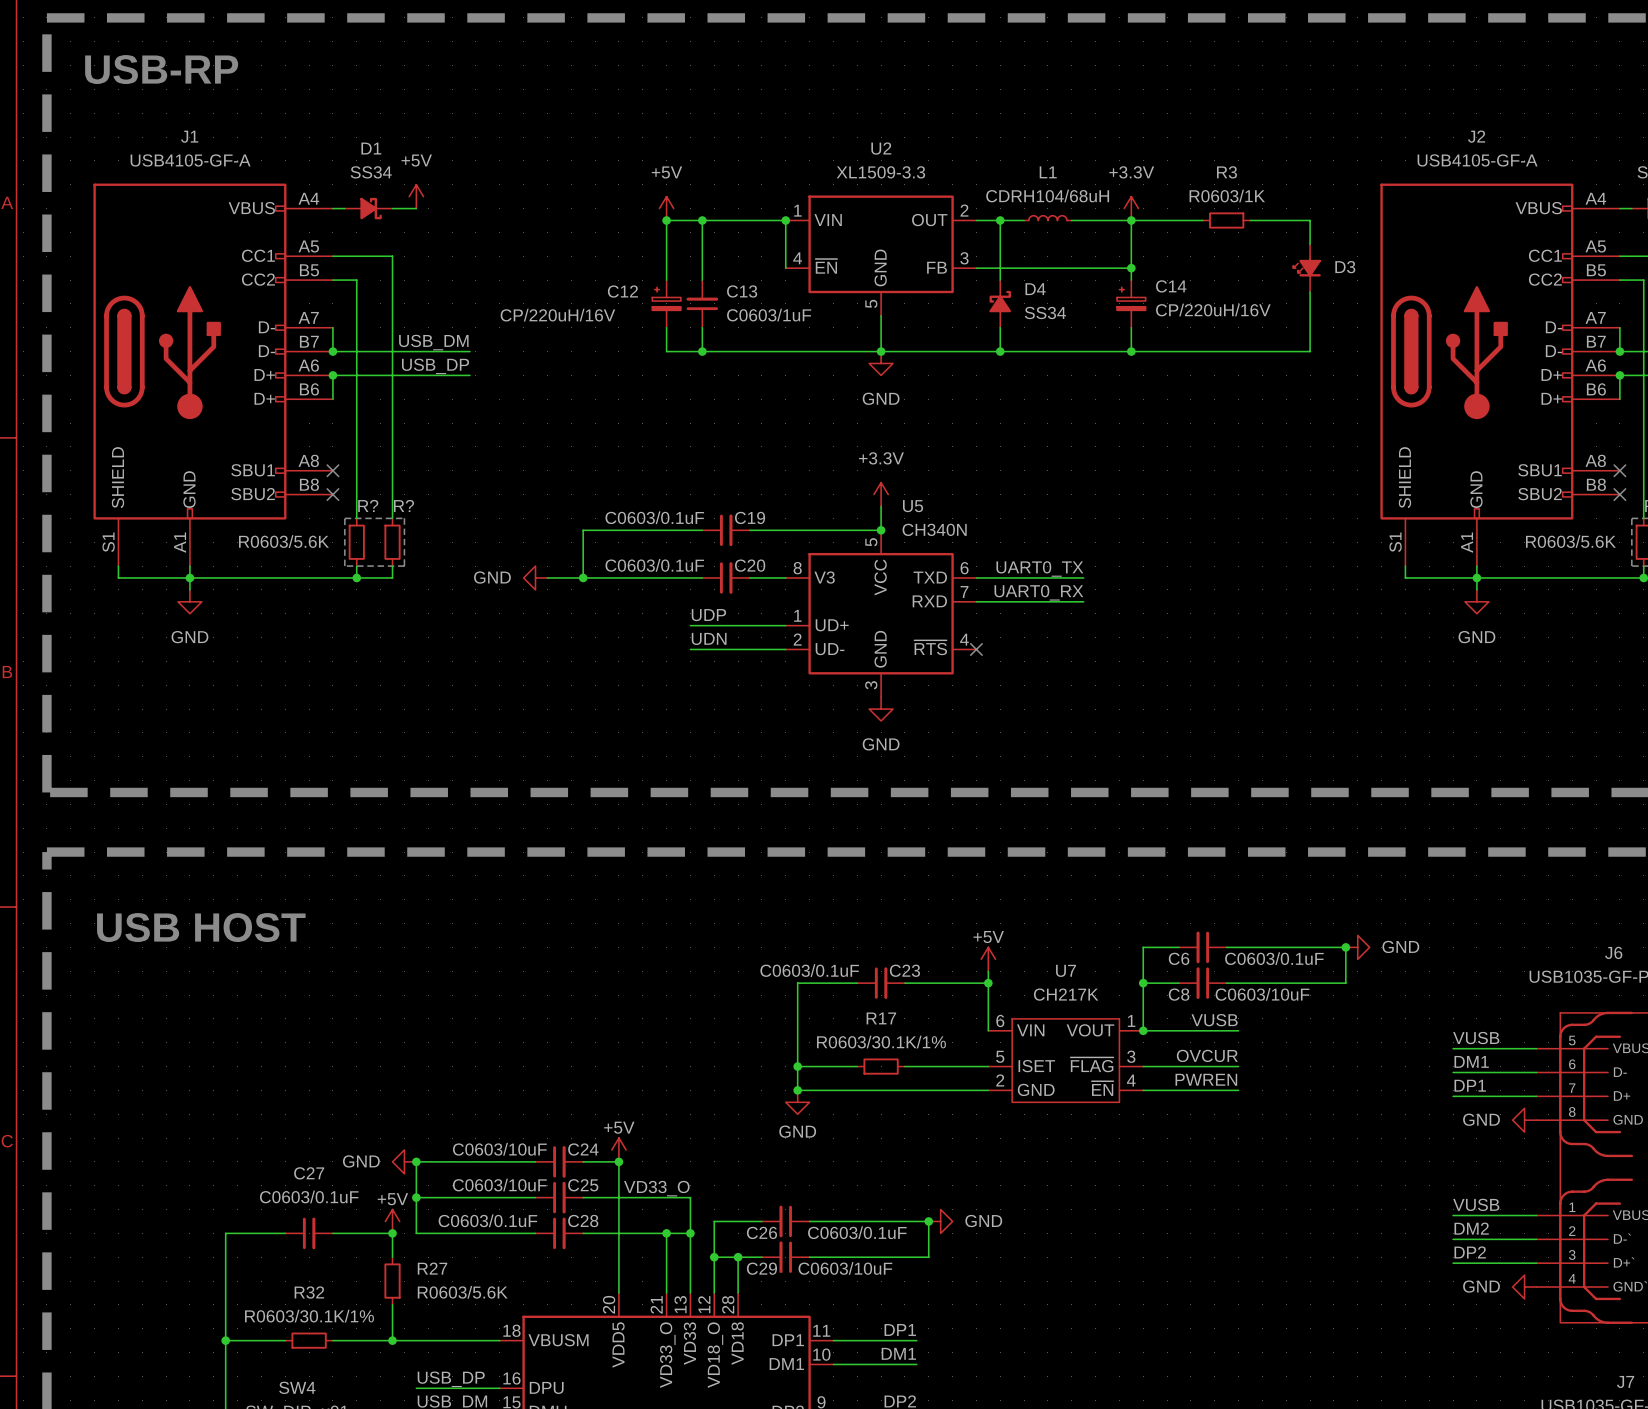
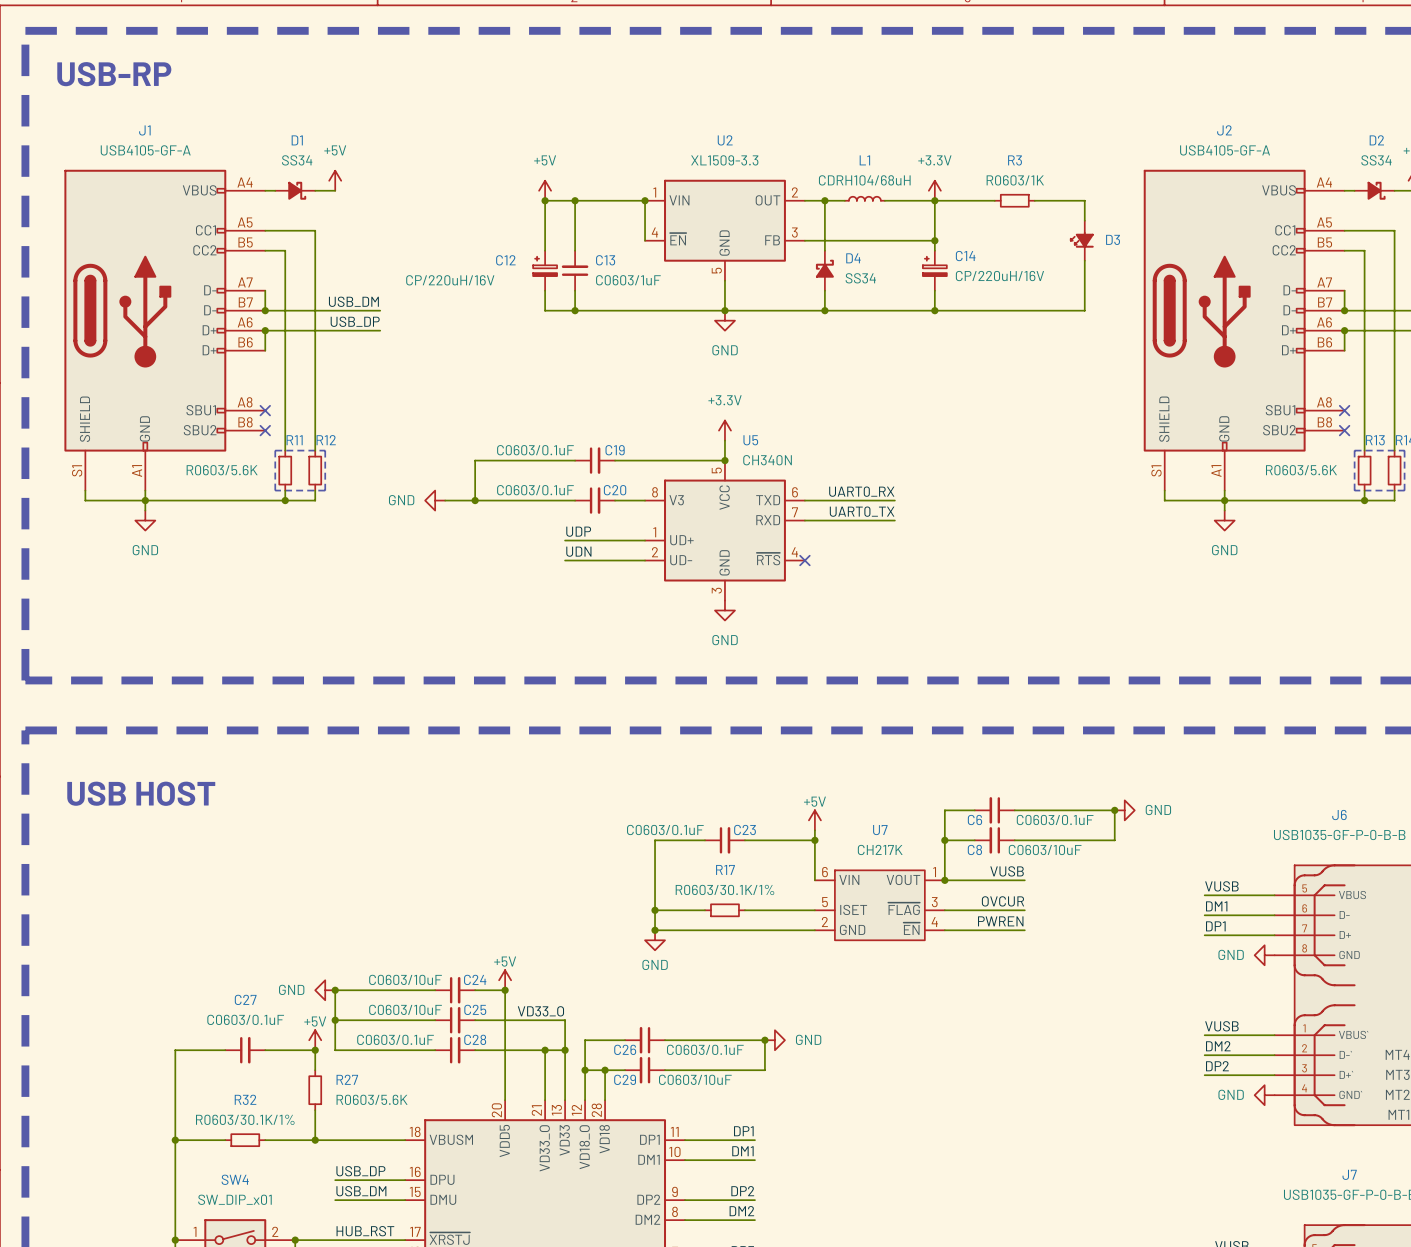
R? name: R? (368, 505) -> R11 (294, 440)
R? name: R? (403, 505) -> R12 (326, 440)
label: UART0_TX (1039, 568) -> UART0_RX (861, 491)
label: UART0_RX (1038, 592) -> UART0_TX (862, 511)

